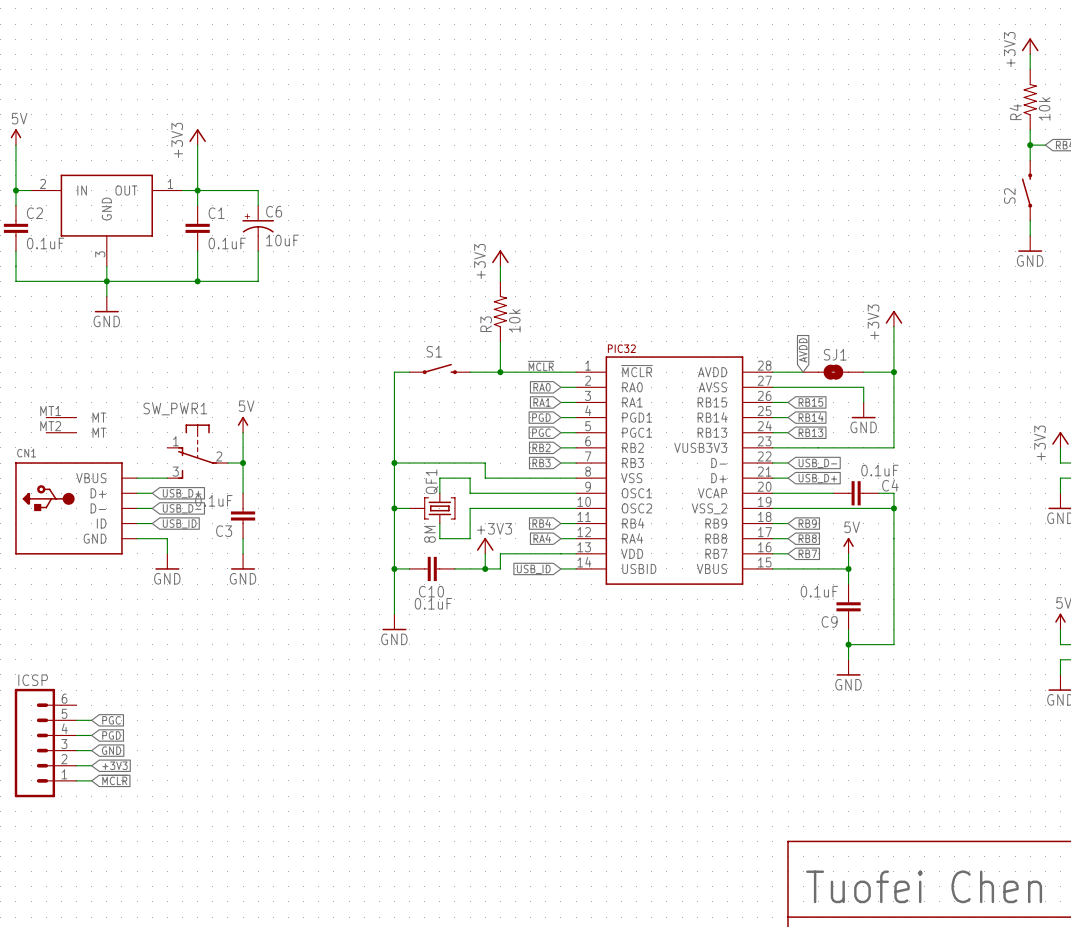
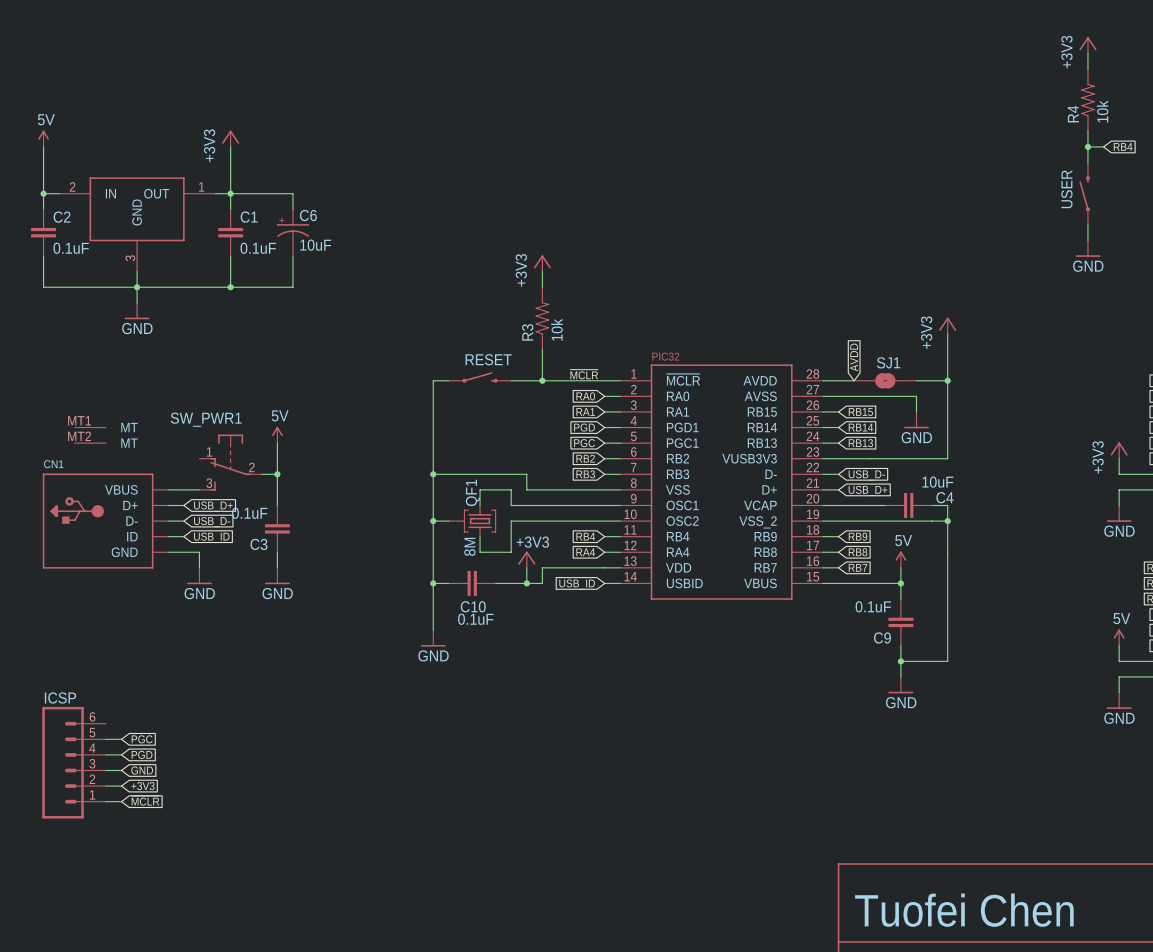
S2 name: S2 (1009, 196) -> USER (1066, 189)
S1 name: S1 (434, 351) -> RESET (488, 359)
C4 value: 0.1uF (879, 470) -> 10uF (937, 482)

